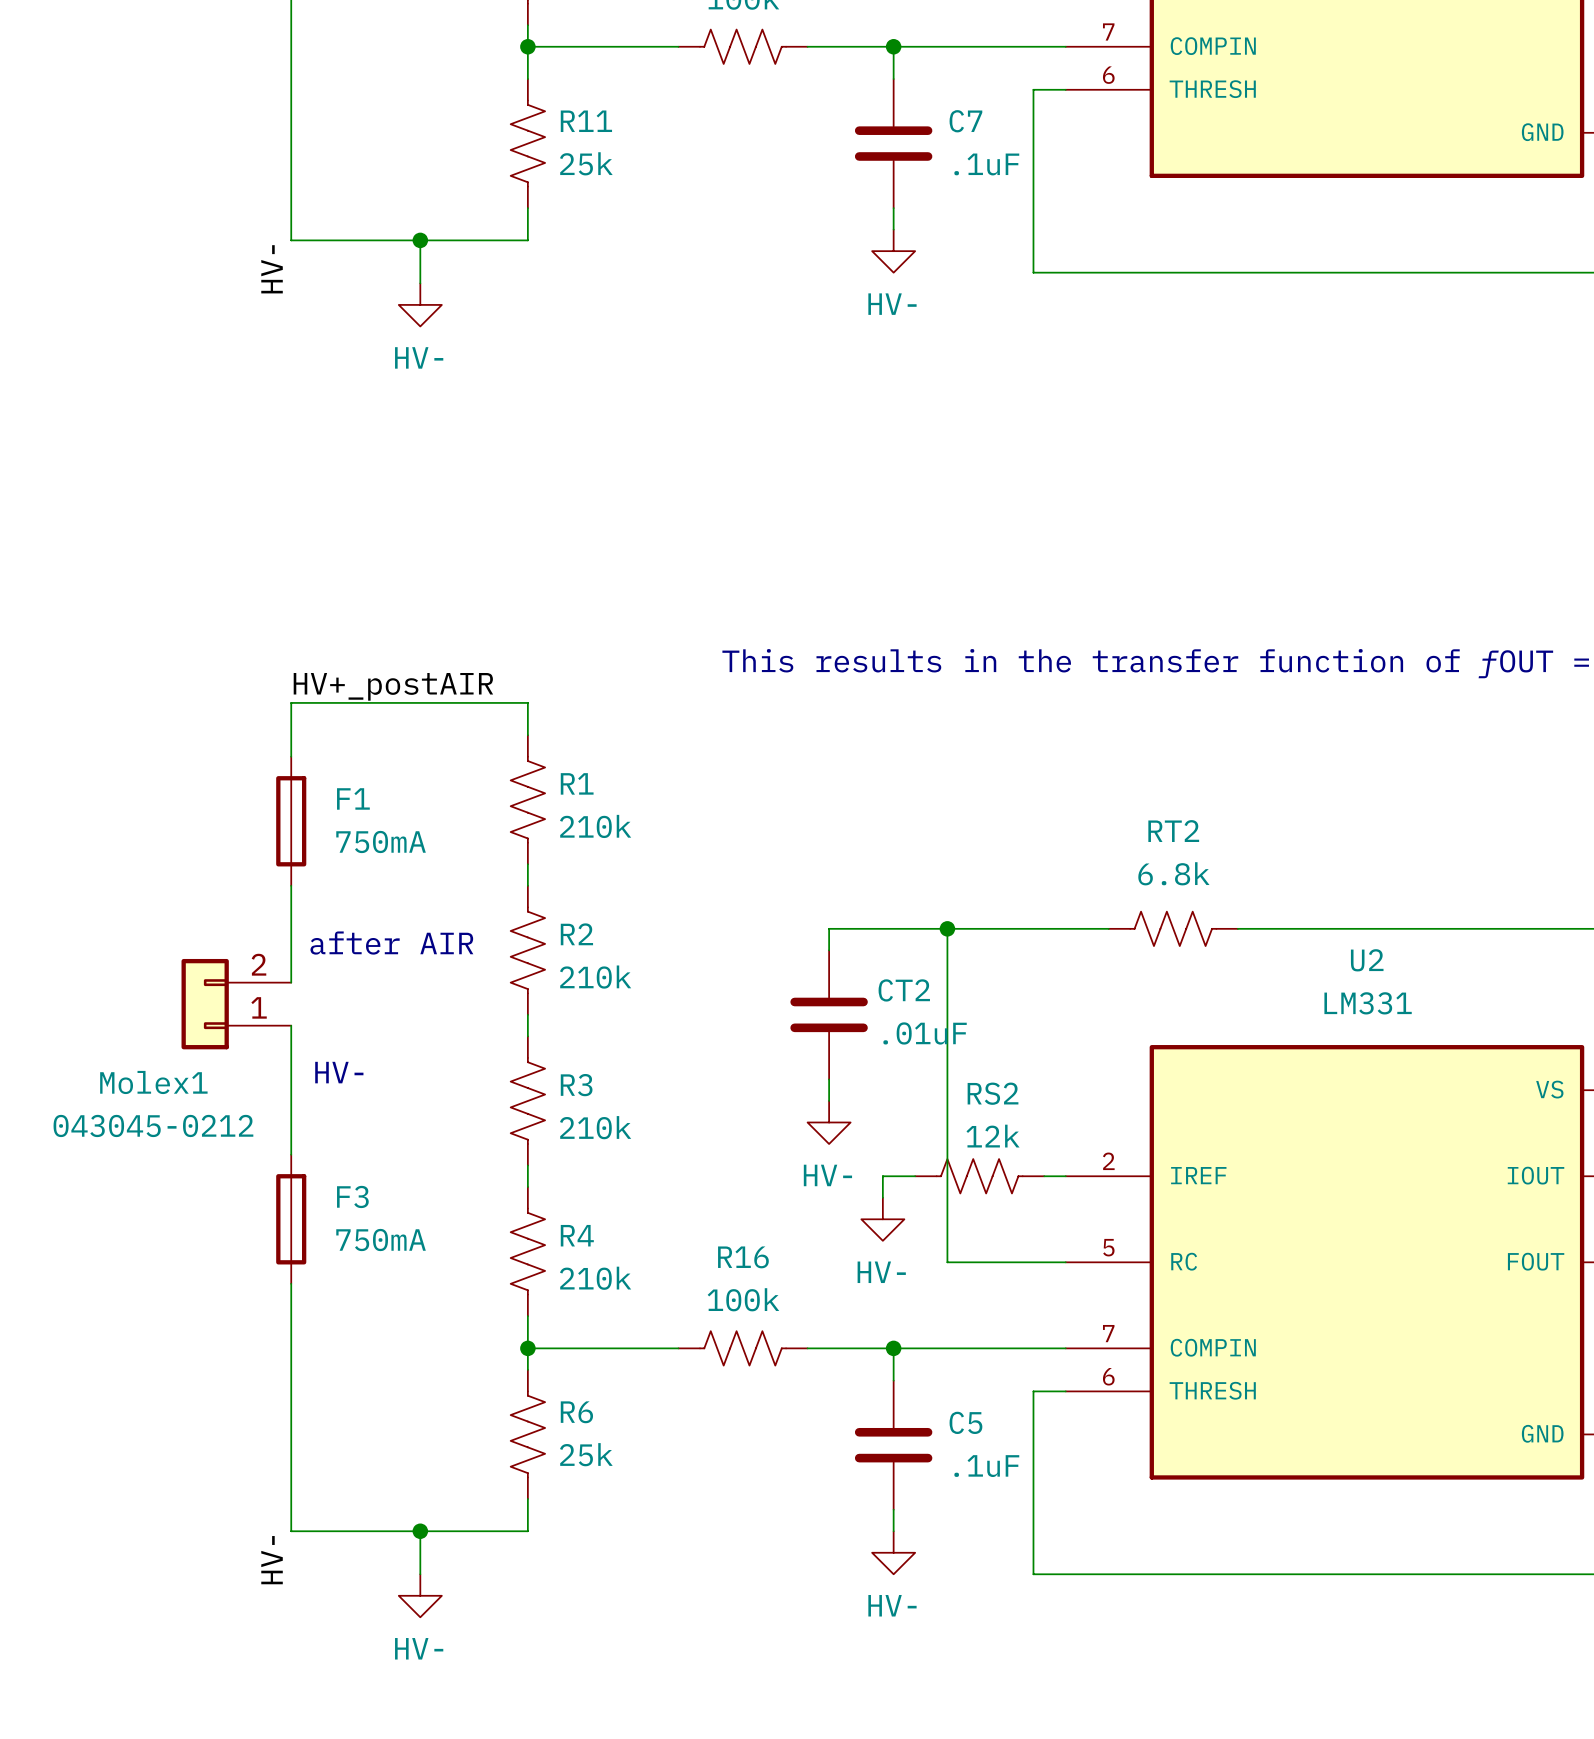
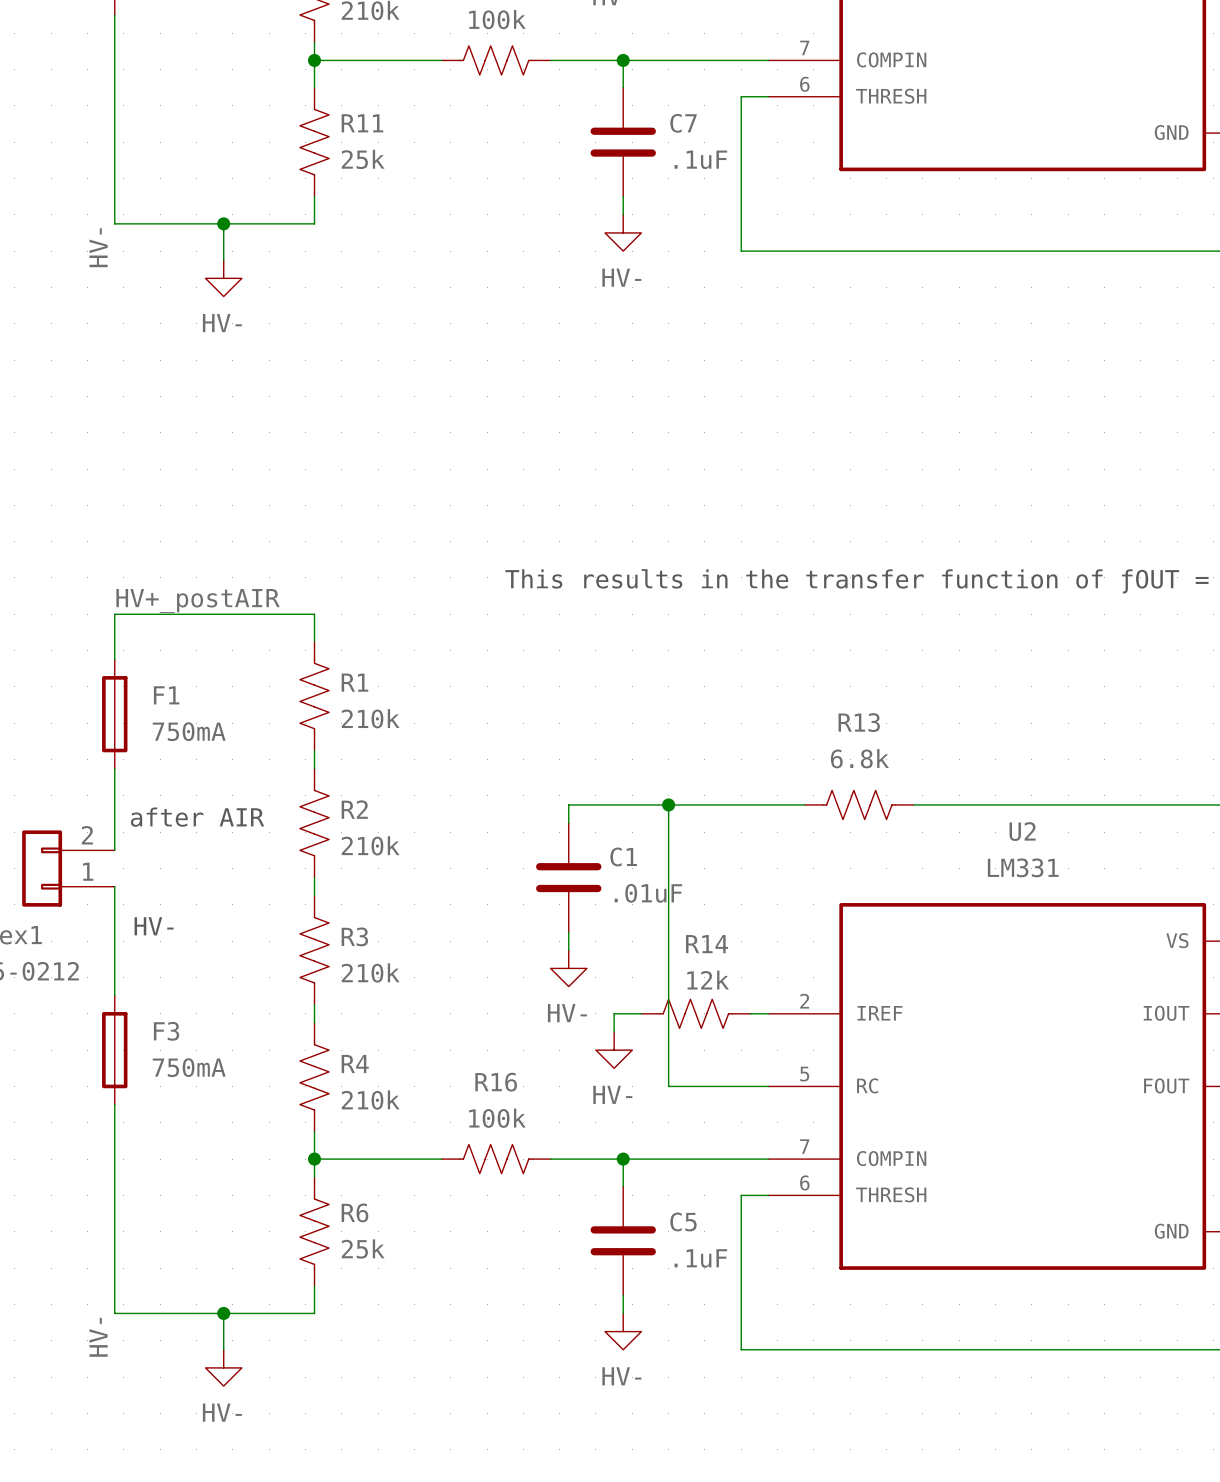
RT2 name: RT2 (1173, 831) -> R13 (859, 722)
CT2 name: CT2 (904, 990) -> C1 (623, 856)
RS2 name: RS2 (993, 1093) -> R14 (707, 944)

